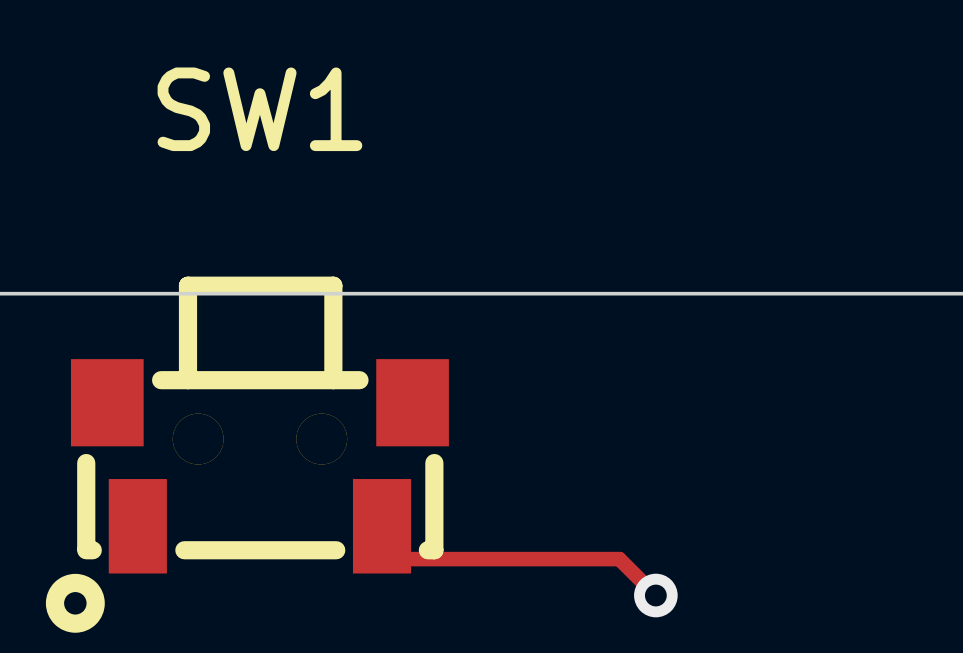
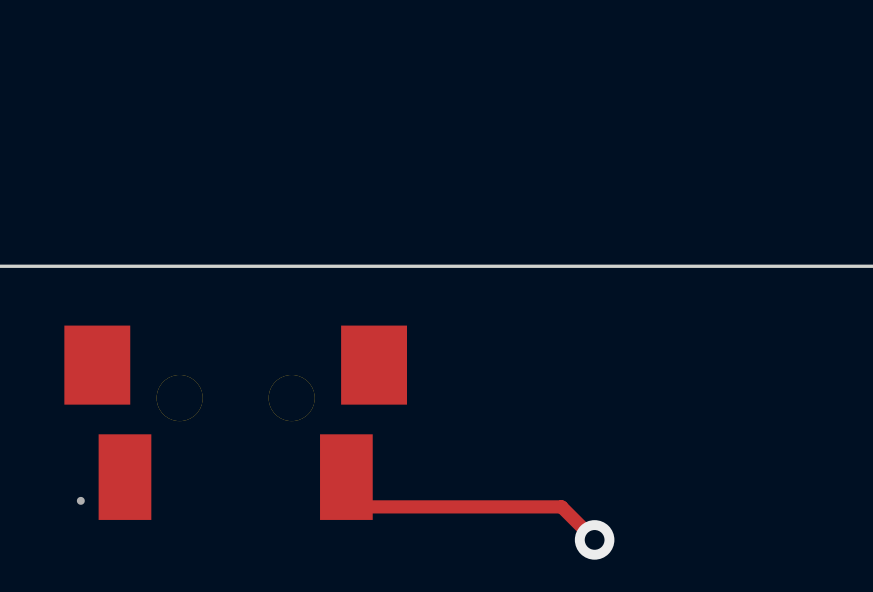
SW1: (247, 454) -> none
part: none -> (235, 422)

